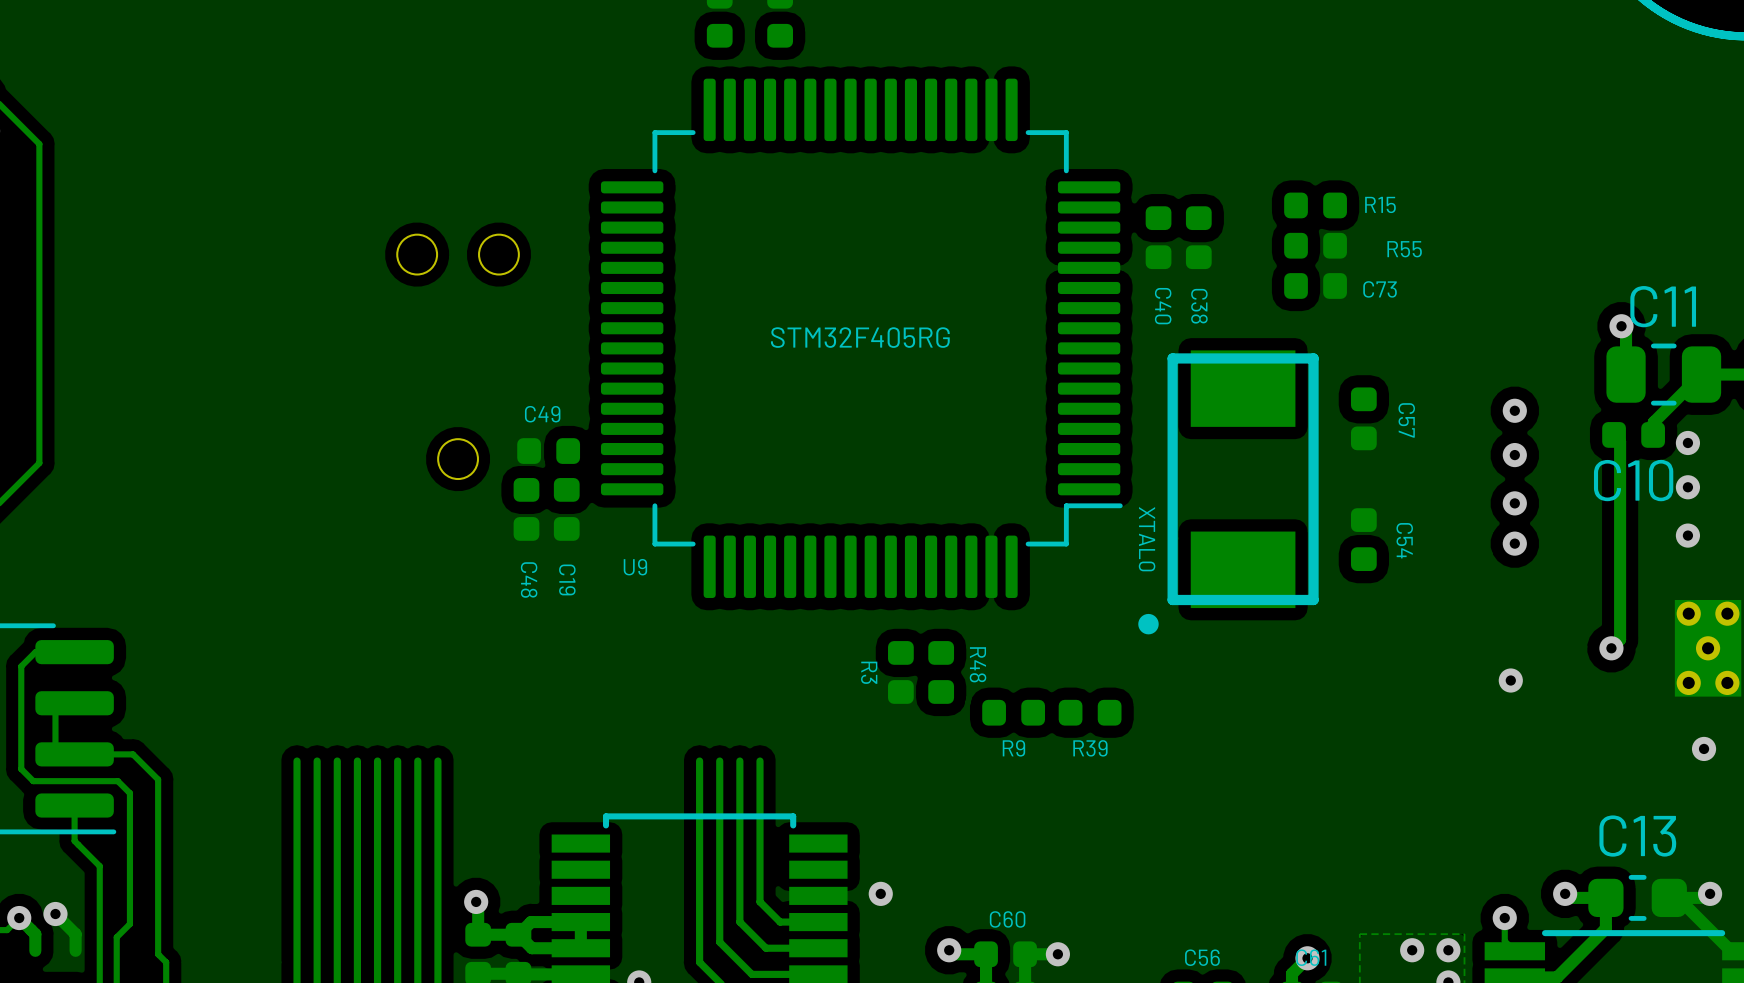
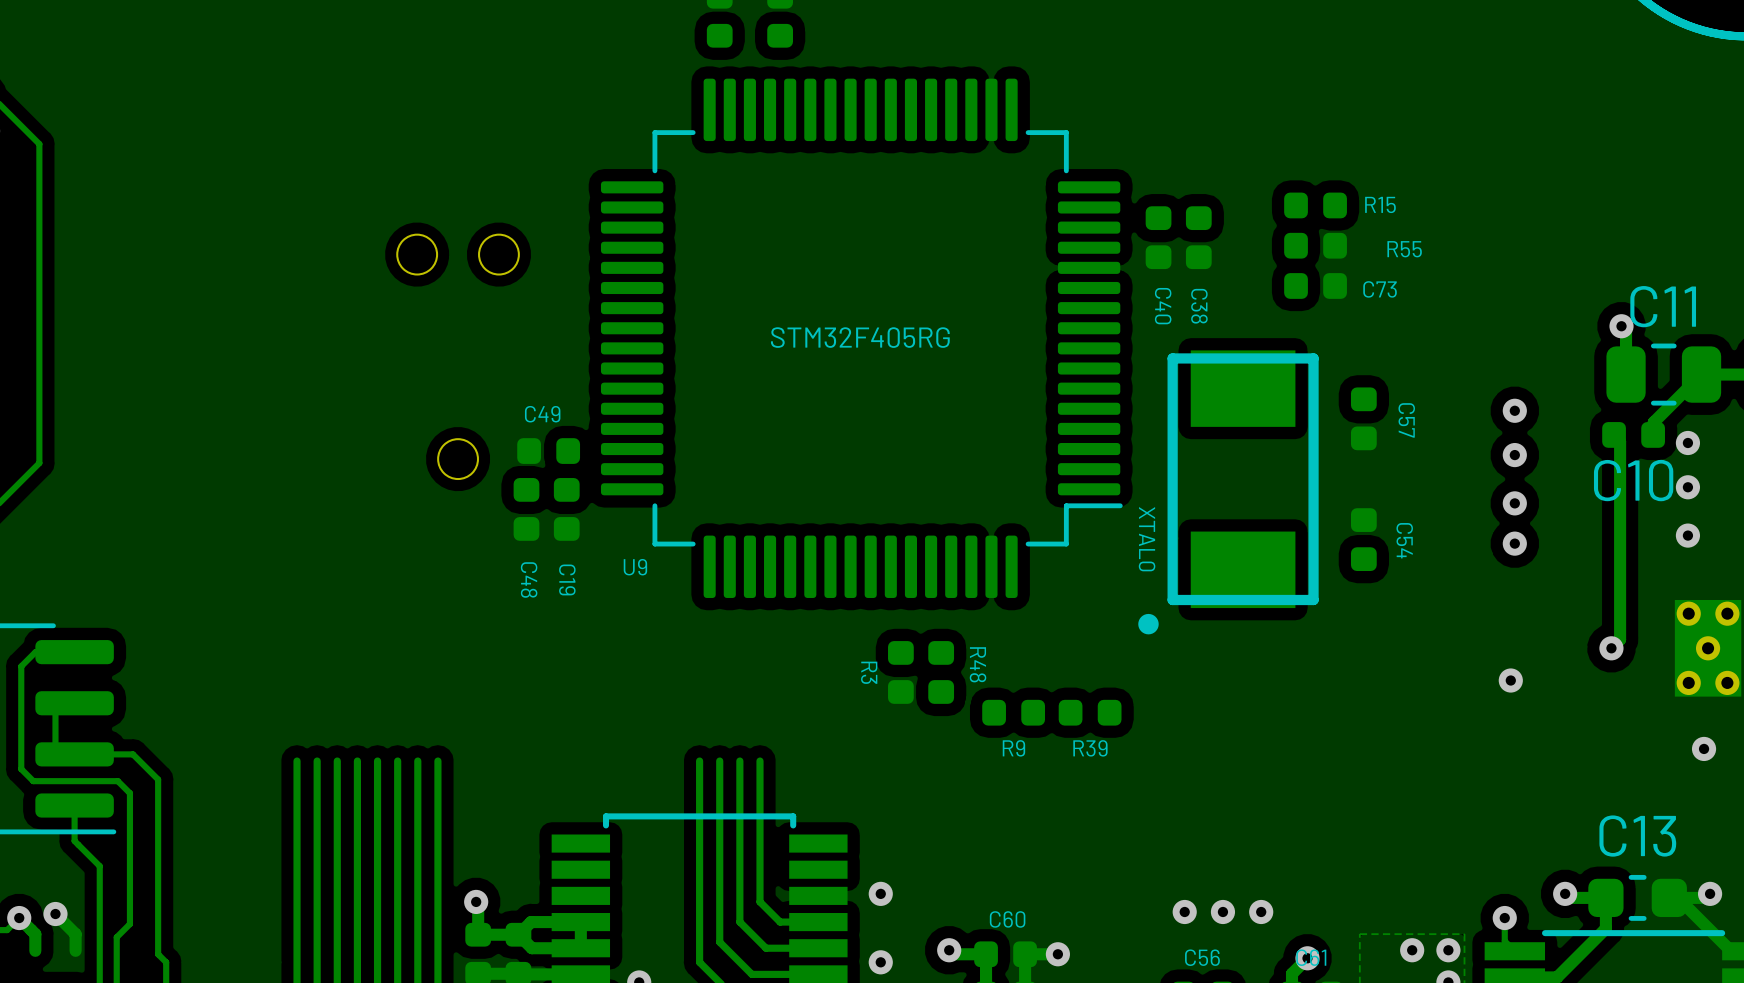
via: none -> (1184, 911)
via: none -> (1222, 911)
via: none -> (1261, 911)
via: none -> (880, 962)

